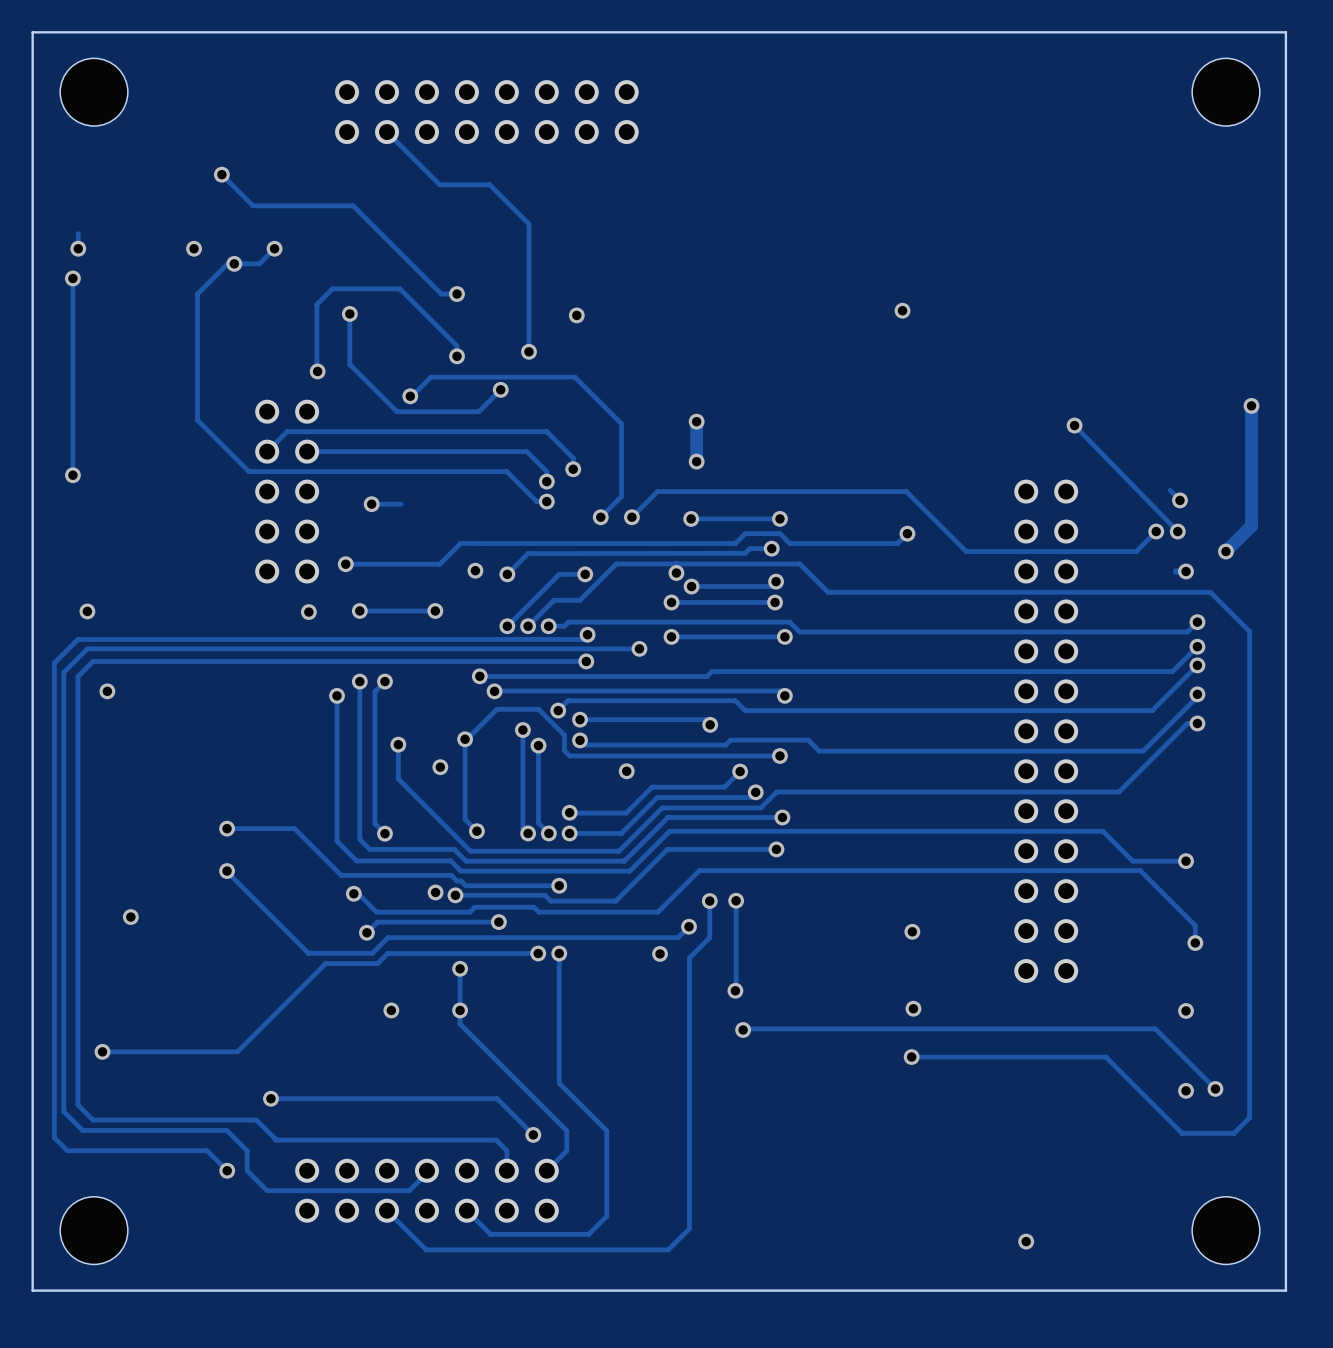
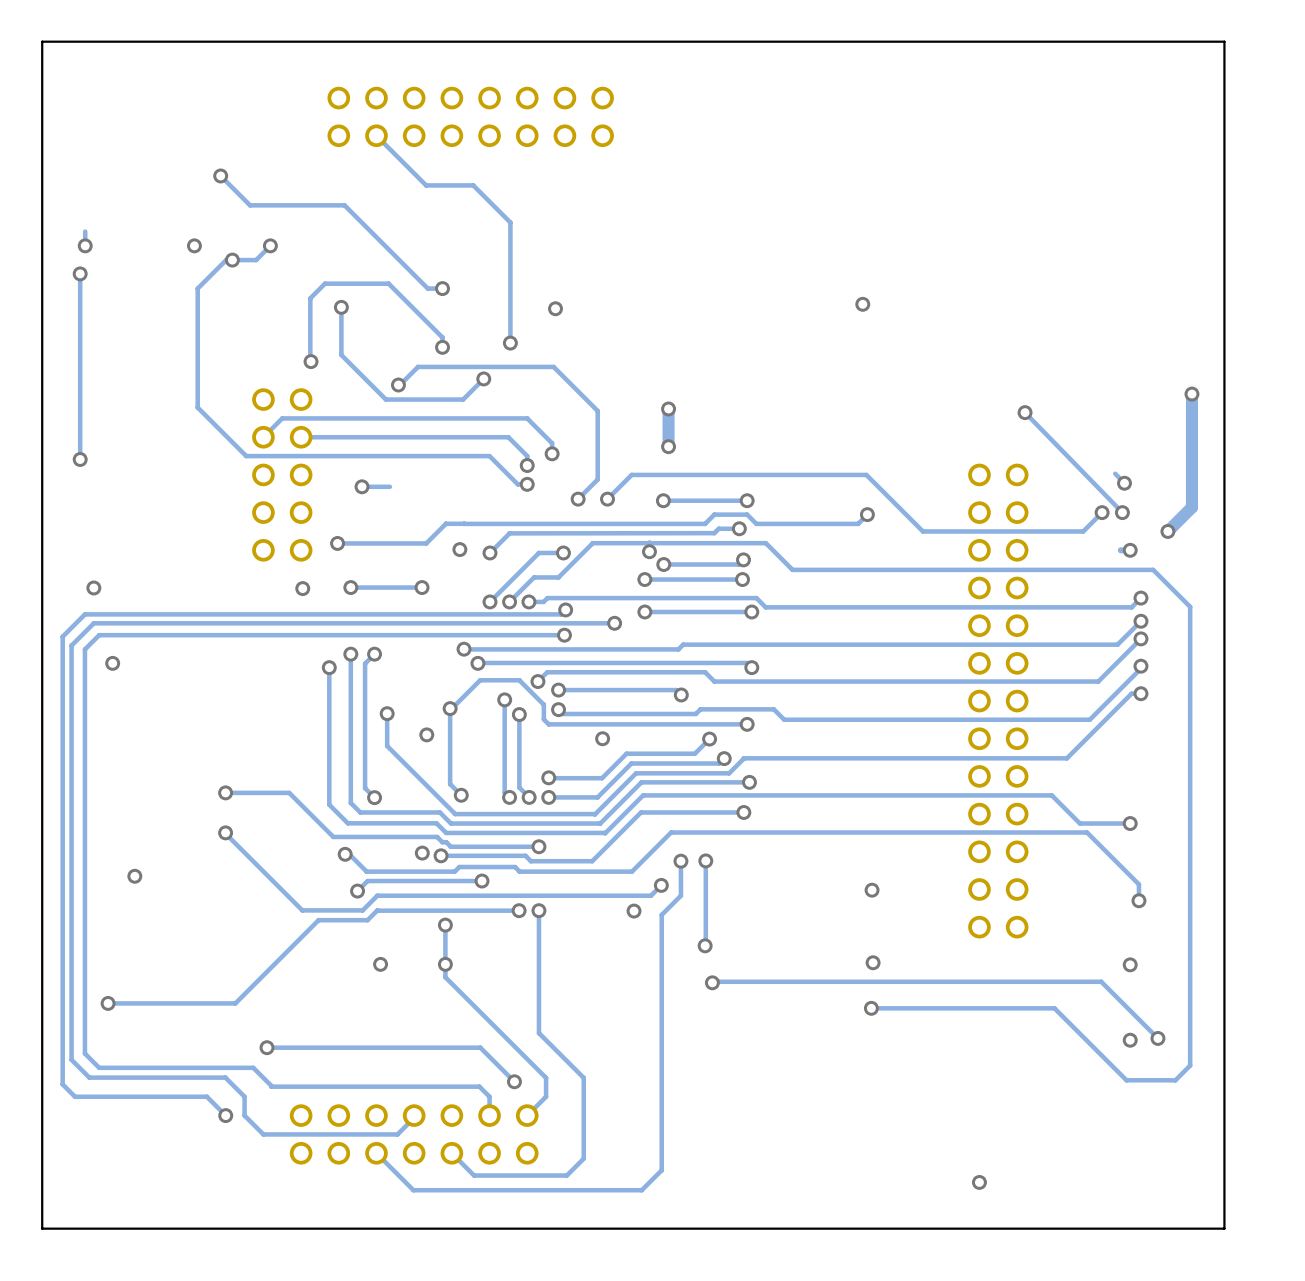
part: (94, 92) -> none
part: (1225, 92) -> none
part: (94, 1230) -> none
part: (1225, 1230) -> none

